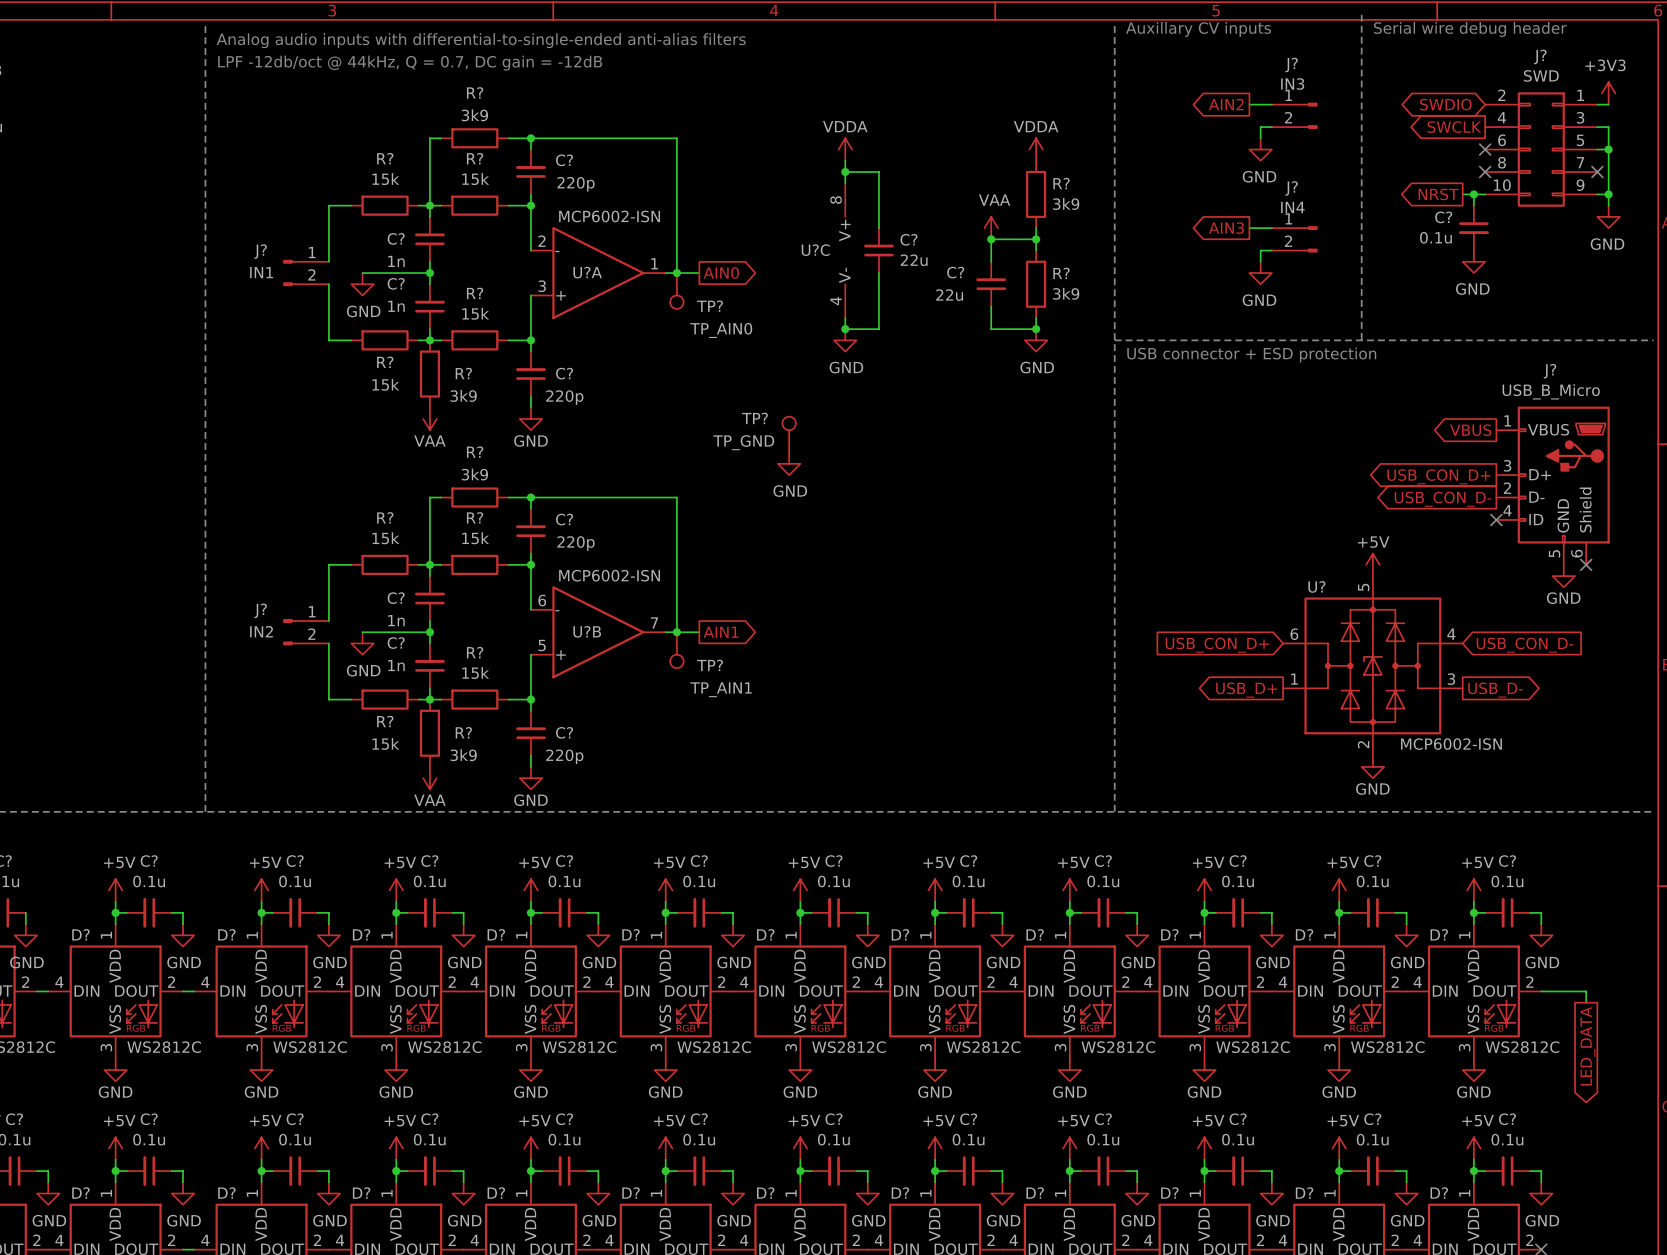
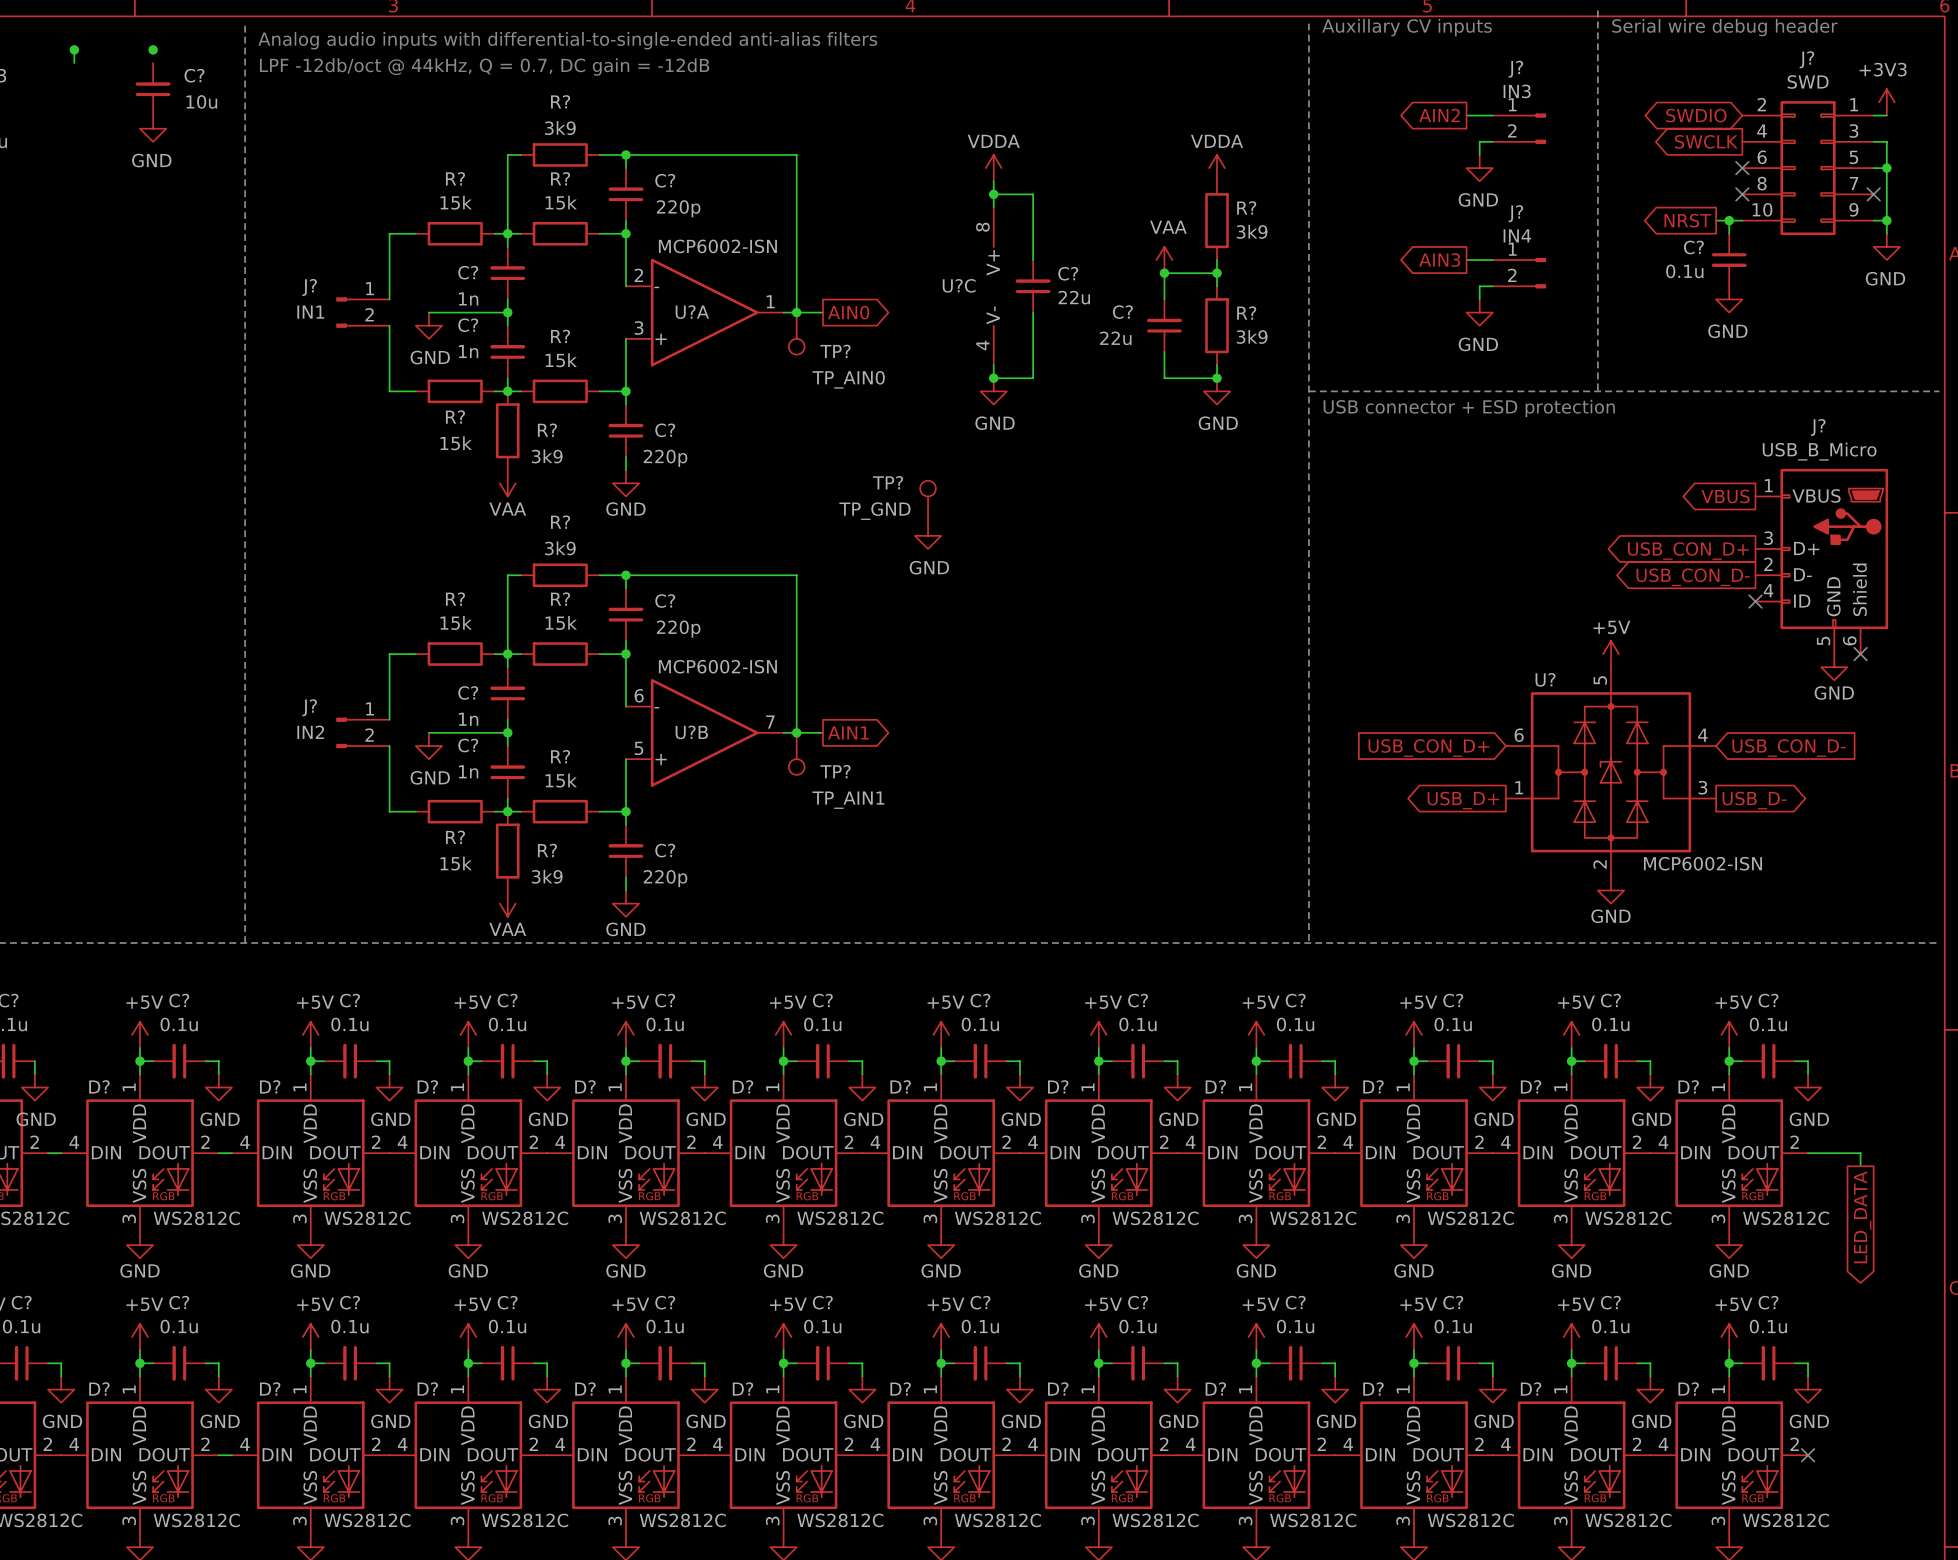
wire: none -> (74, 49) (74, 63)
junction: none -> (74, 49)
junction: none -> (153, 49)
C?: none -> 10u (153, 89)
power symbol: none -> GND (153, 128)

